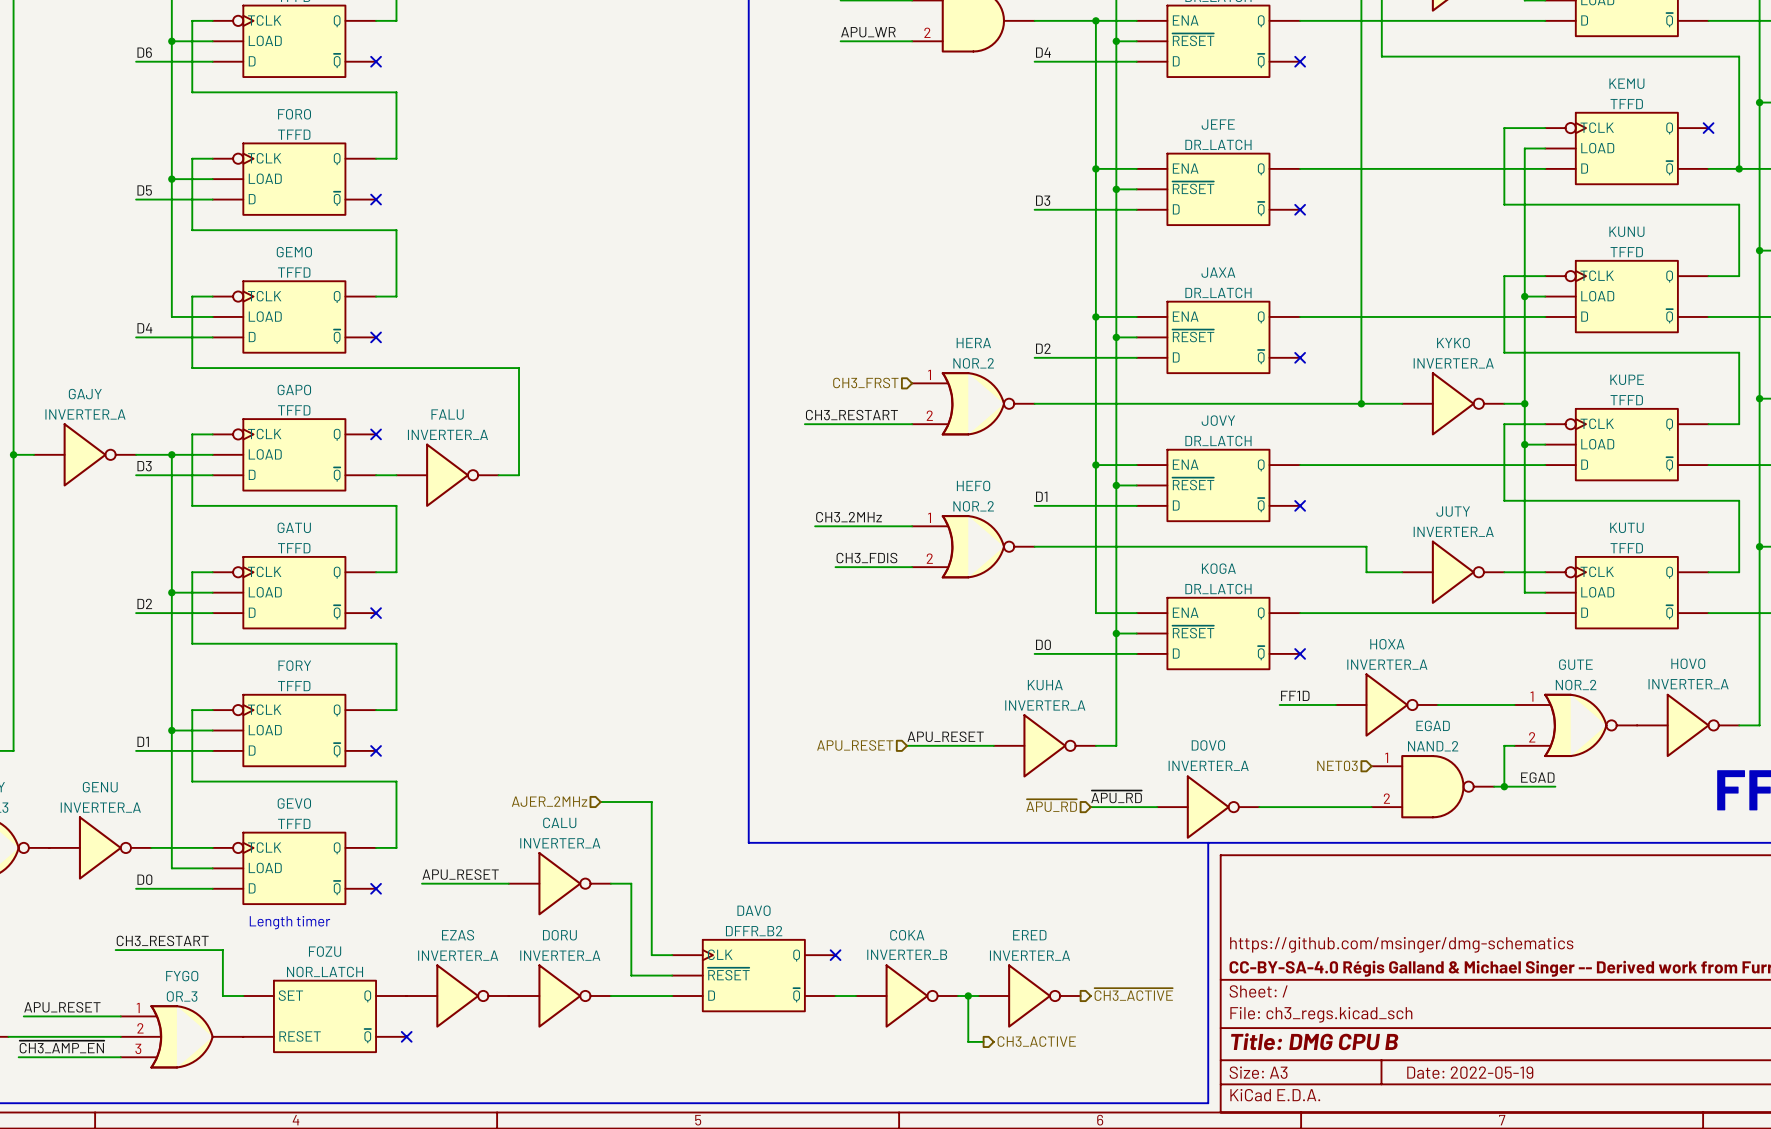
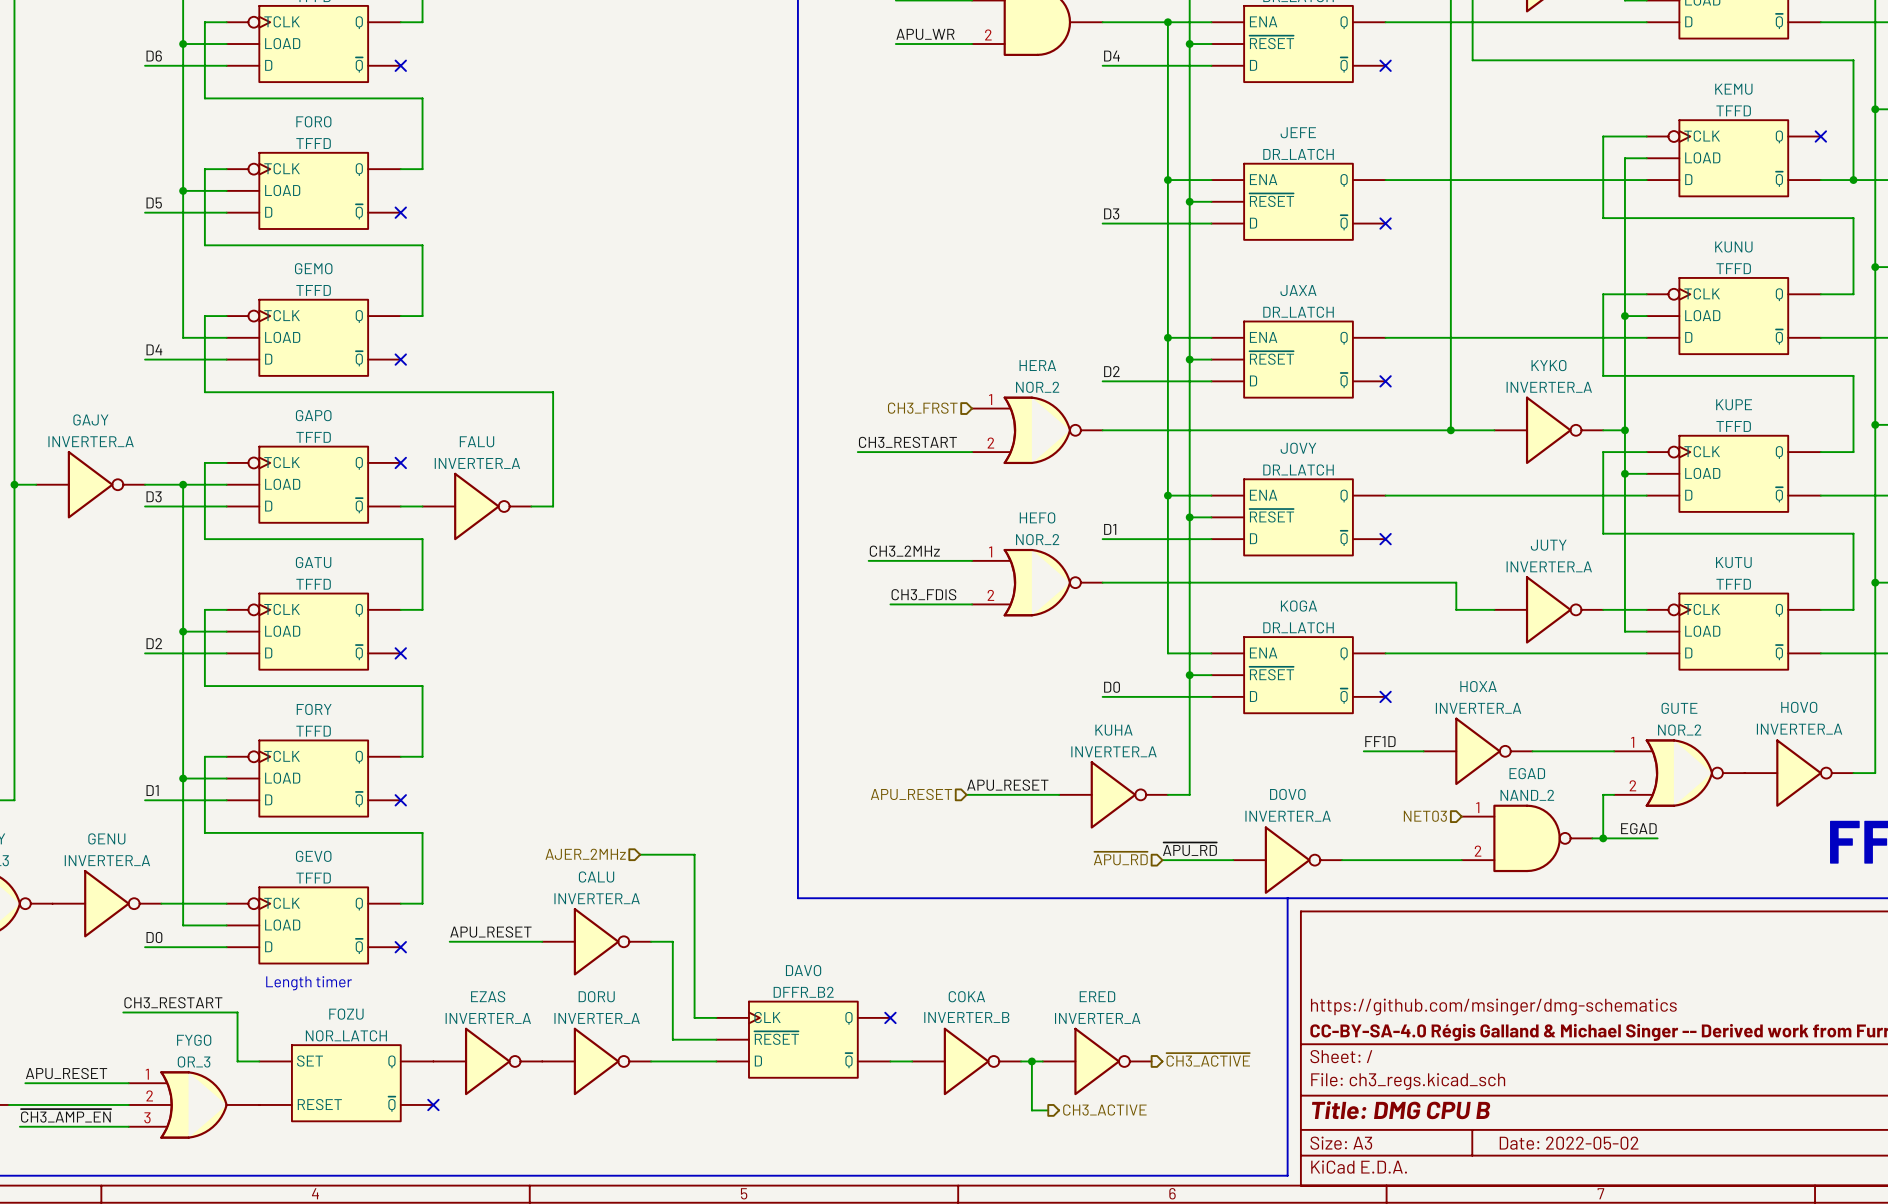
title block: Date: 2022-05-19 (1470, 1072) -> Date: 2022-05-02 (1569, 1143)

